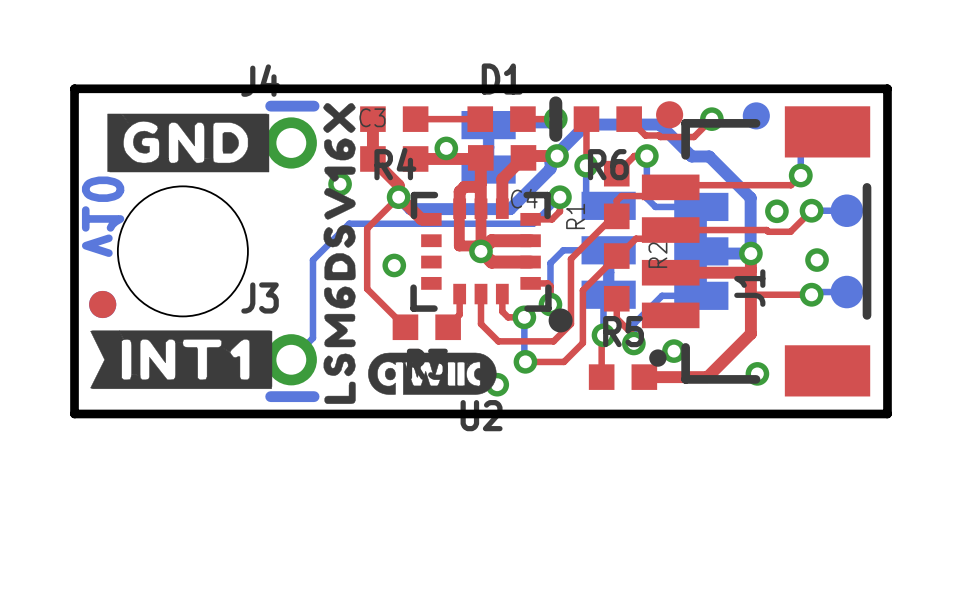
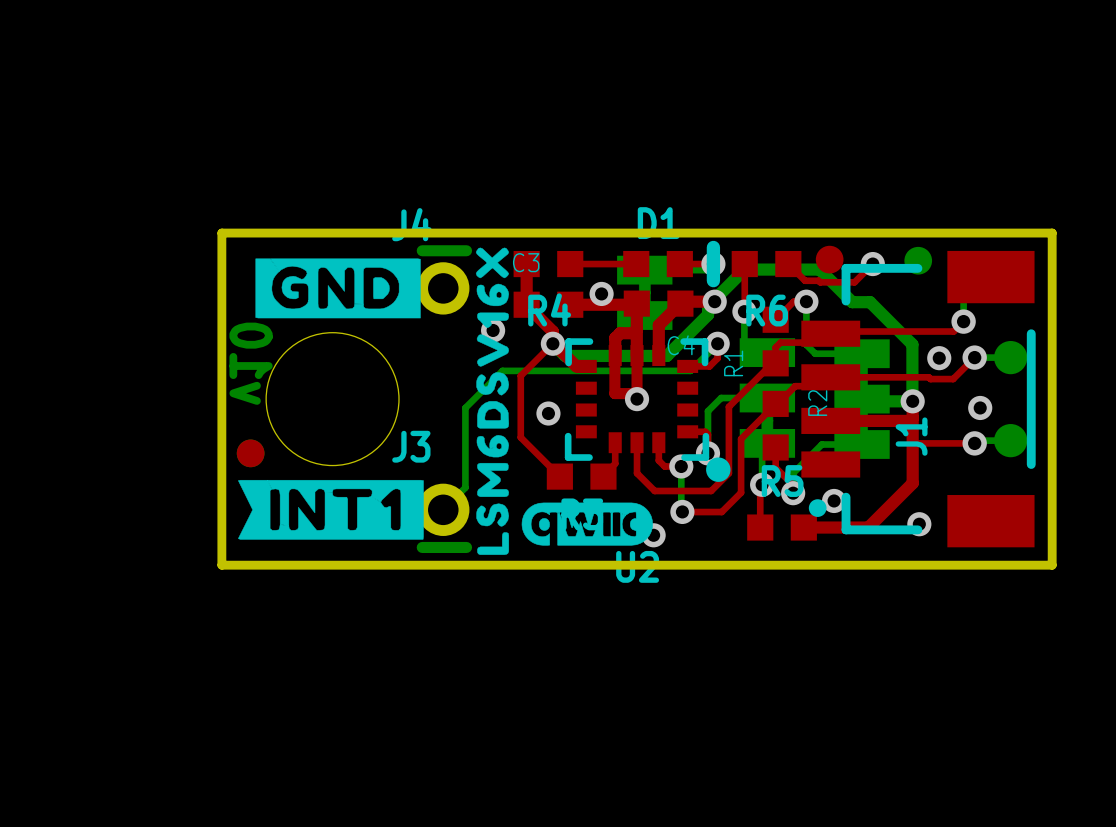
top track: (530, 240) (491, 240) (481, 251) (491, 262) (530, 262) -> none

